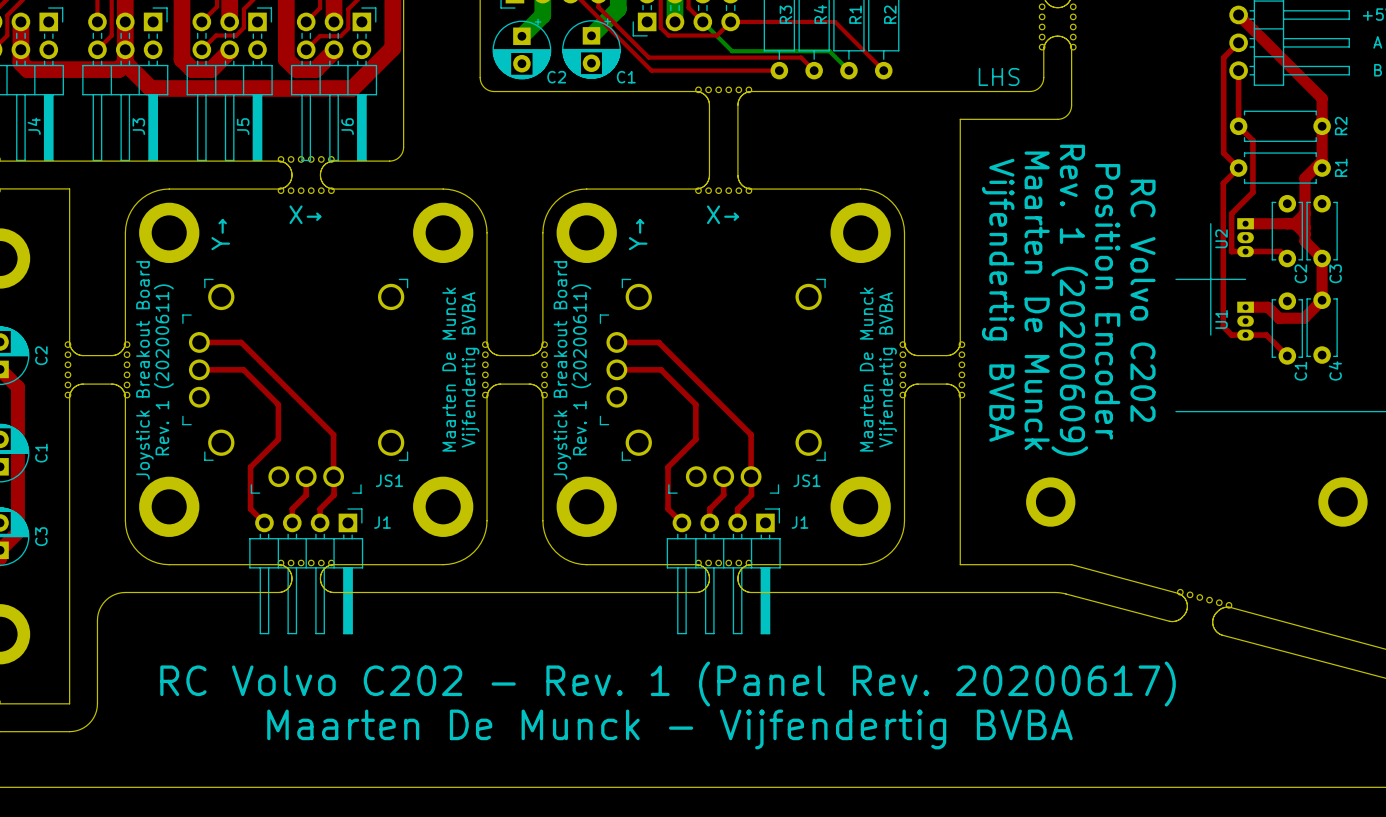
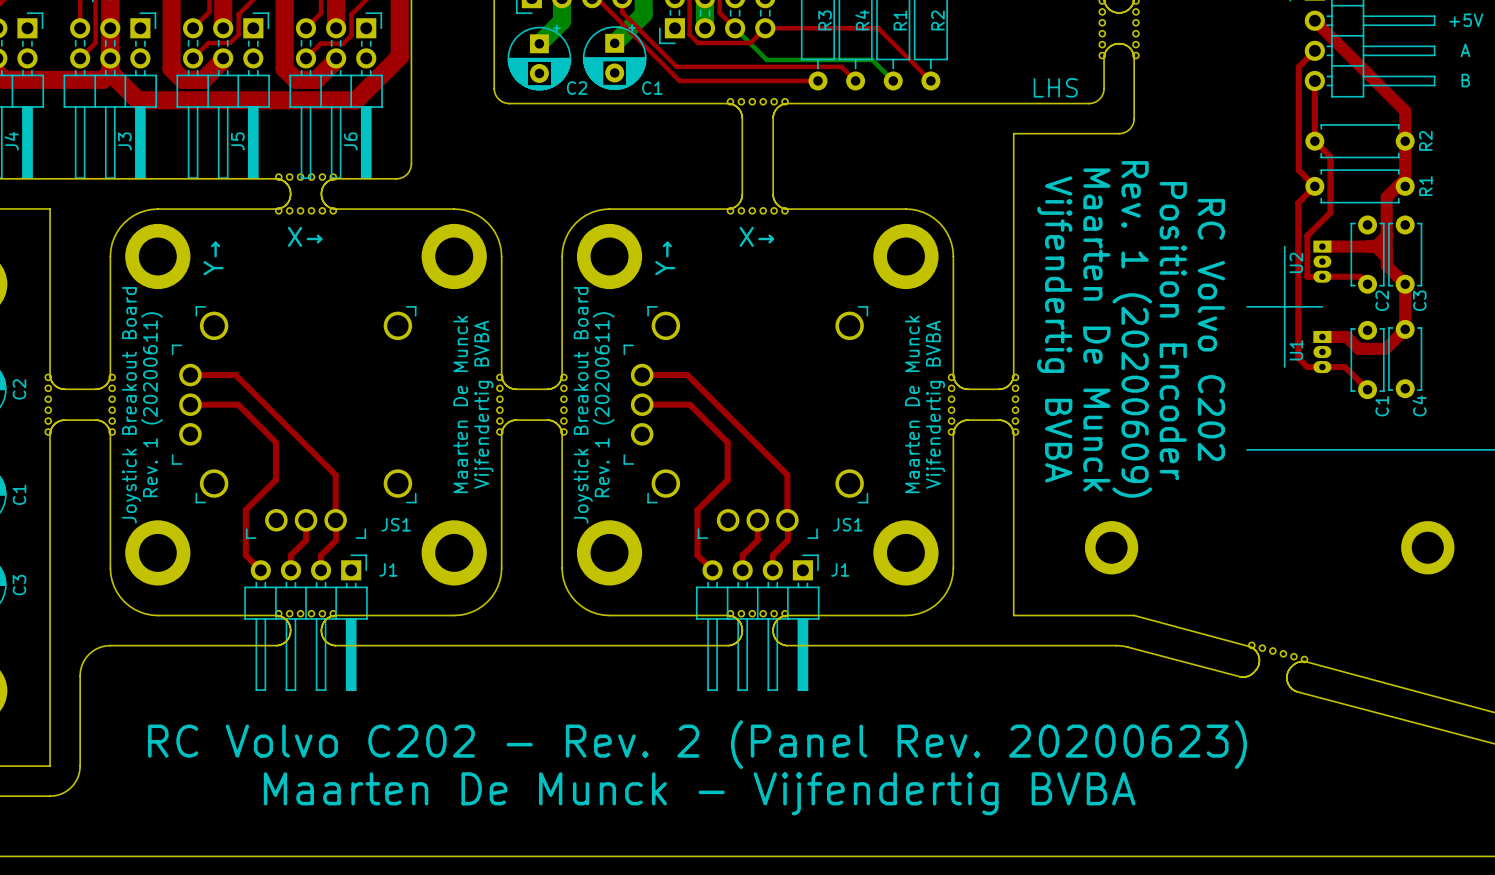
text: RC Volvo C202 - Rev. 1 (Panel Rev. 20200617) (668, 684) -> RC Volvo C202 - Rev. 2 (Panel Rev. 20200623) (697, 744)

